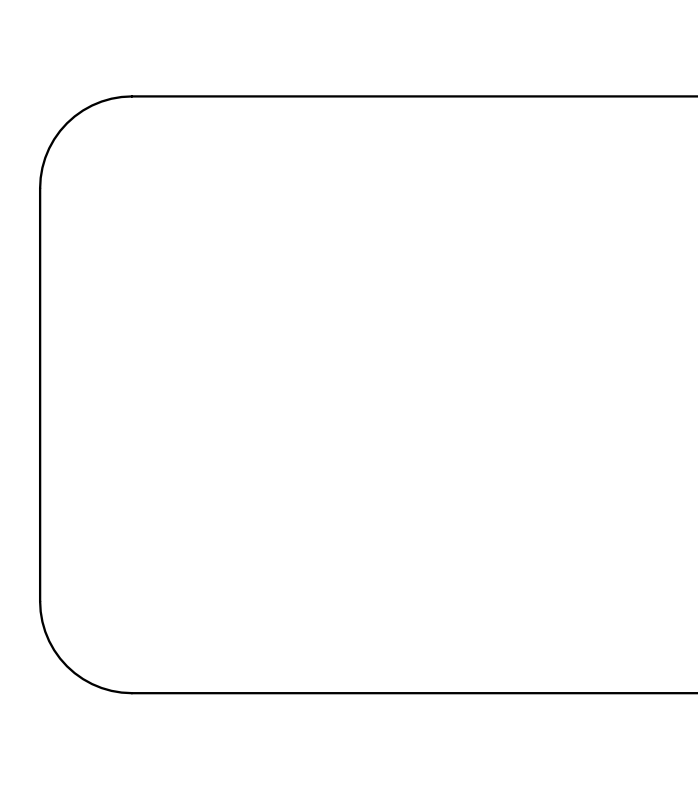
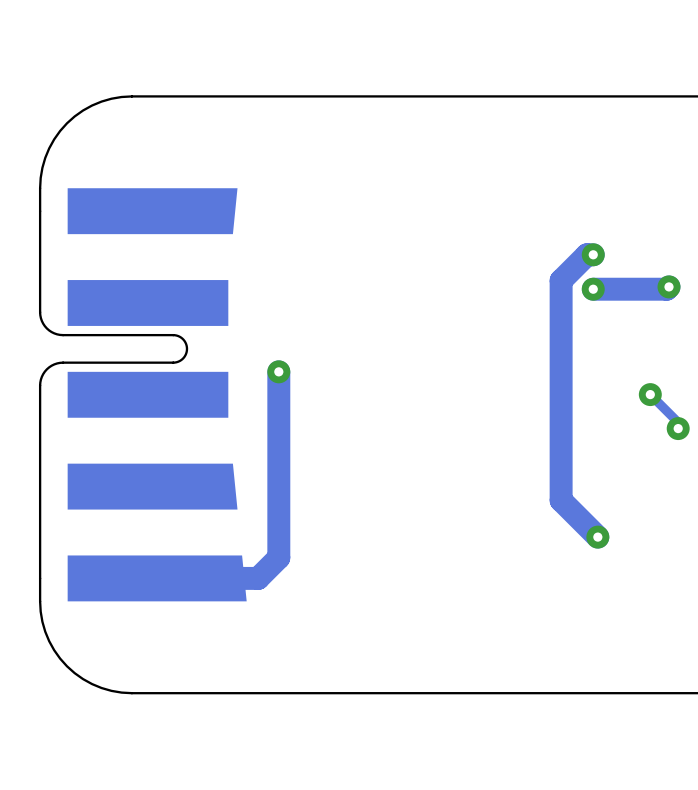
board edge: (40, 211) (40, 578) -> none
track: none -> (593, 254) (586, 254) (561, 280) (561, 500) (597, 537)
via: none -> (593, 254)
track: none -> (669, 286) (666, 289) (593, 289)
via: none -> (669, 286)
via: none -> (593, 289)
track: none -> (278, 371) (278, 557) (258, 578) (154, 578)
via: none -> (278, 371)
part: none -> (142, 394)
track: none -> (650, 394) (678, 422) (678, 428)
via: none -> (650, 394)
via: none -> (678, 428)
via: none -> (597, 537)

